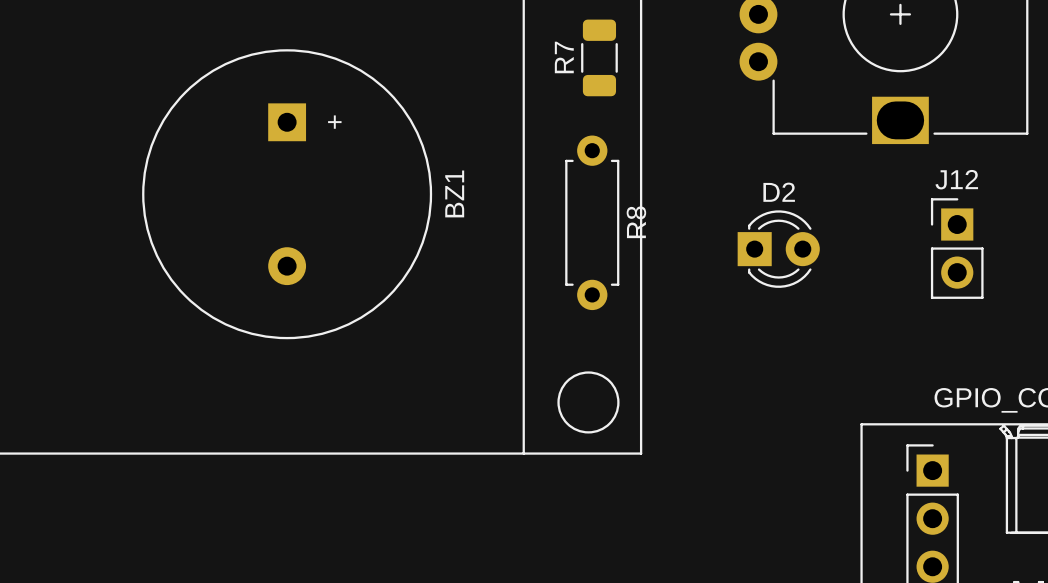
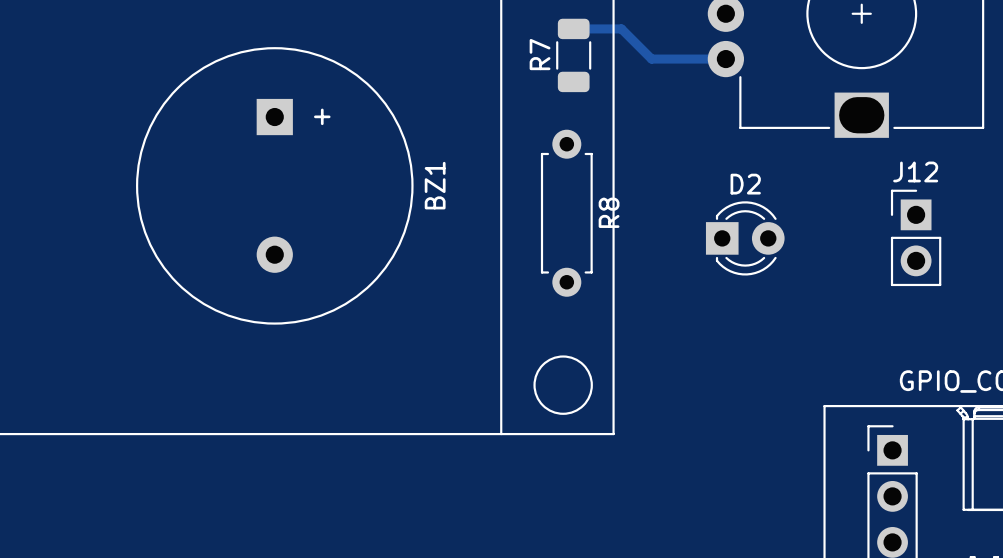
track: none -> (573, 28) (621, 28) (651, 59) (725, 59)

